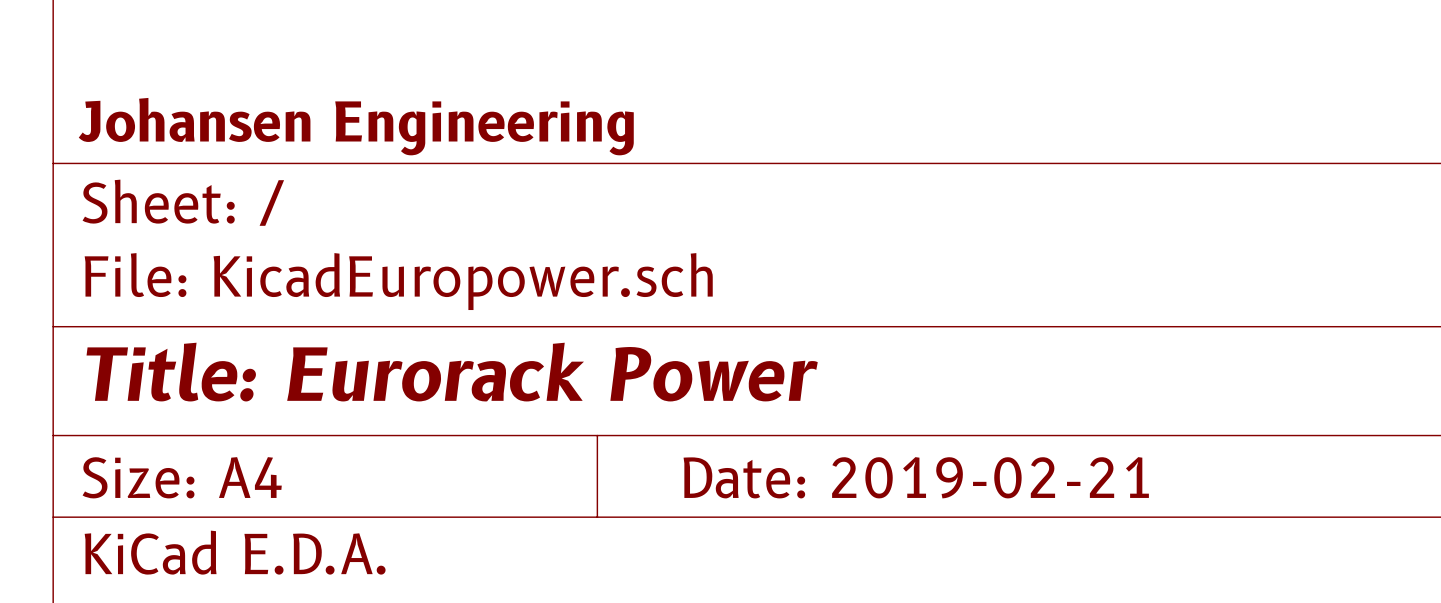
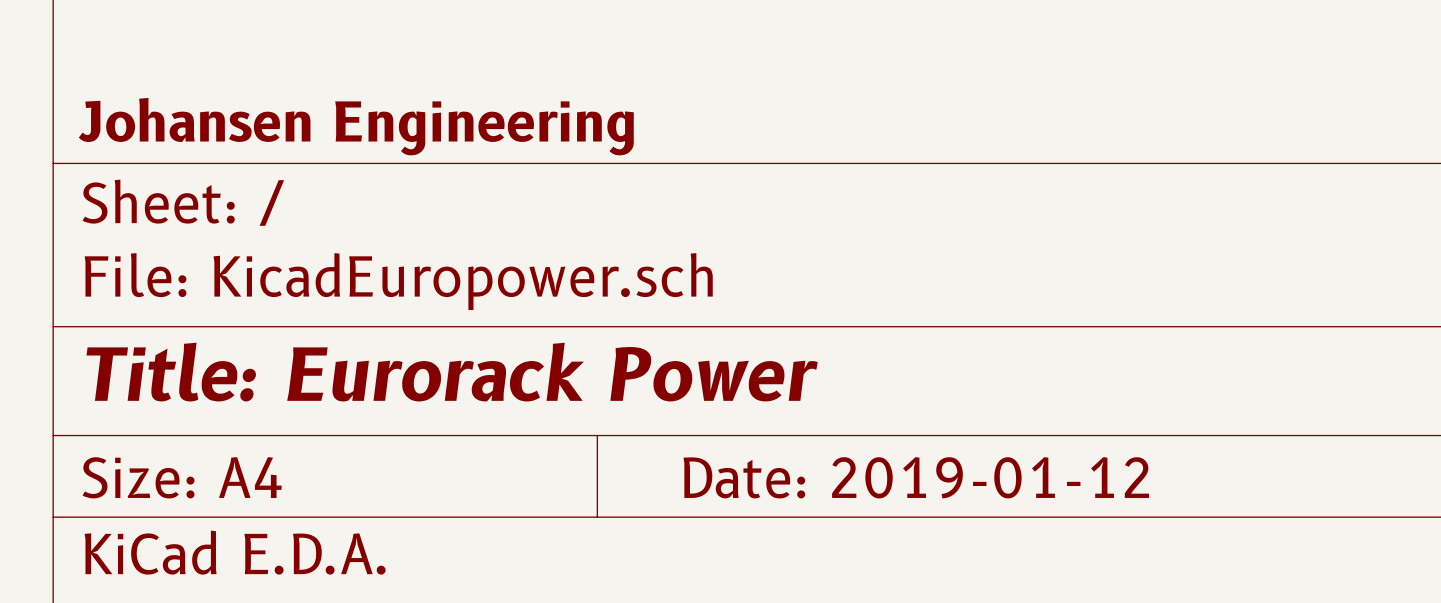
title block: Date: 2019-02-21 (916, 477) -> Date: 2019-01-12 (916, 477)

